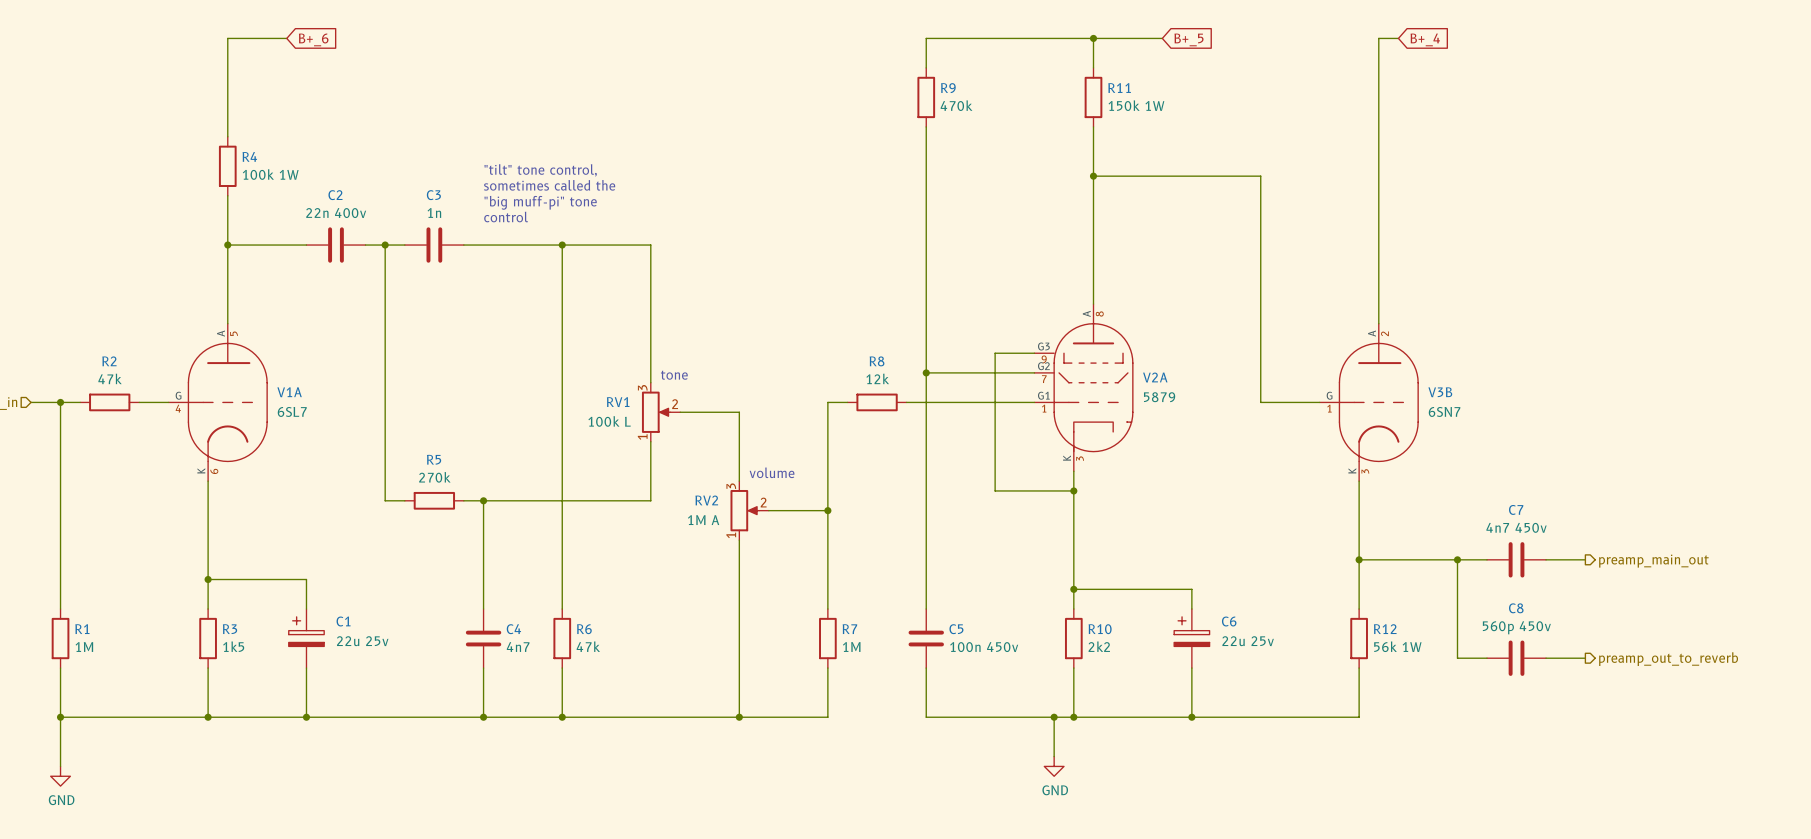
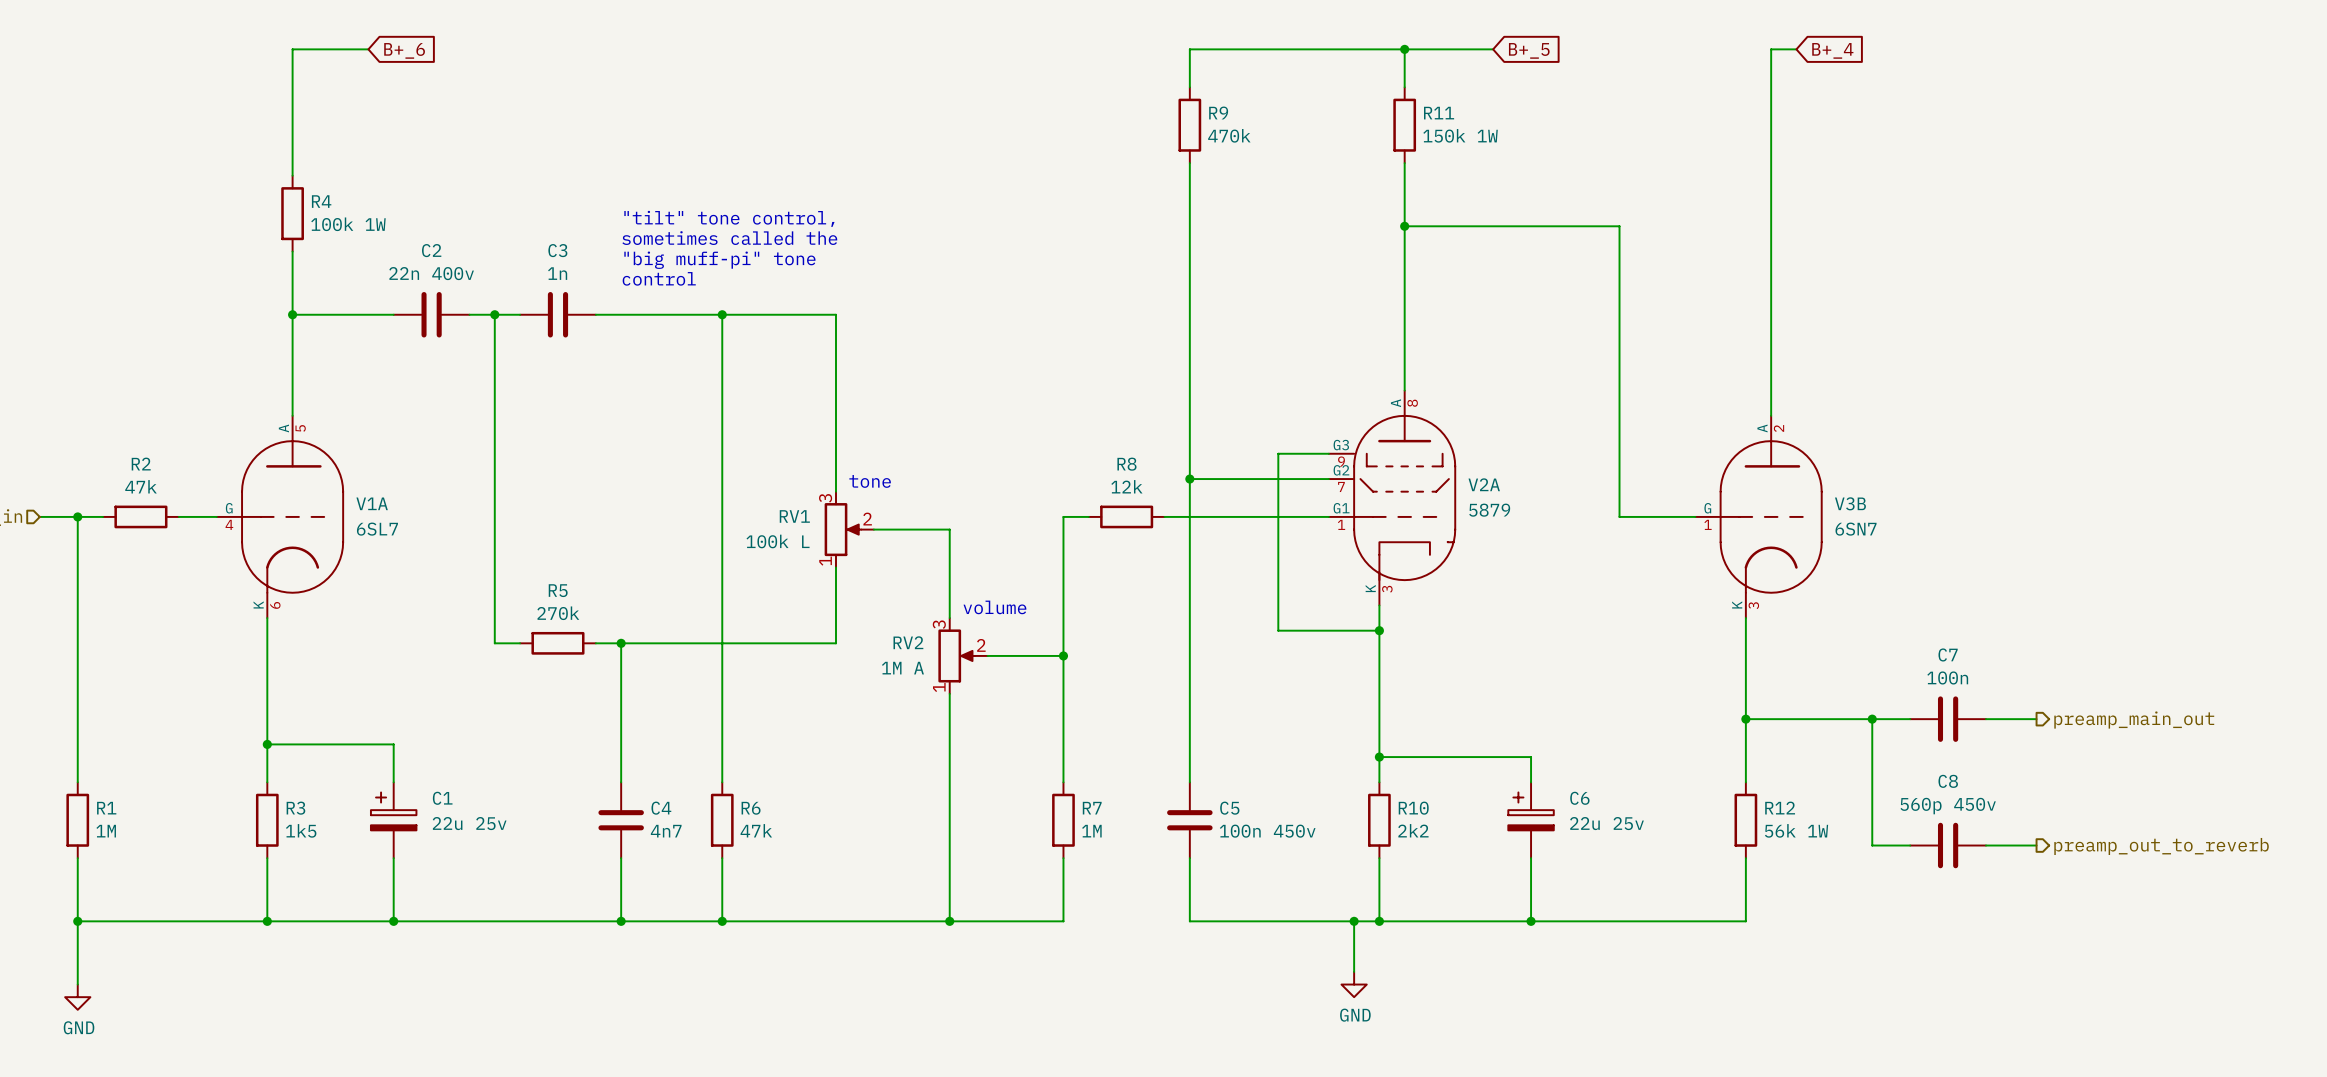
C7 value: 4n7 450v (1516, 527) -> 100n (1947, 677)

